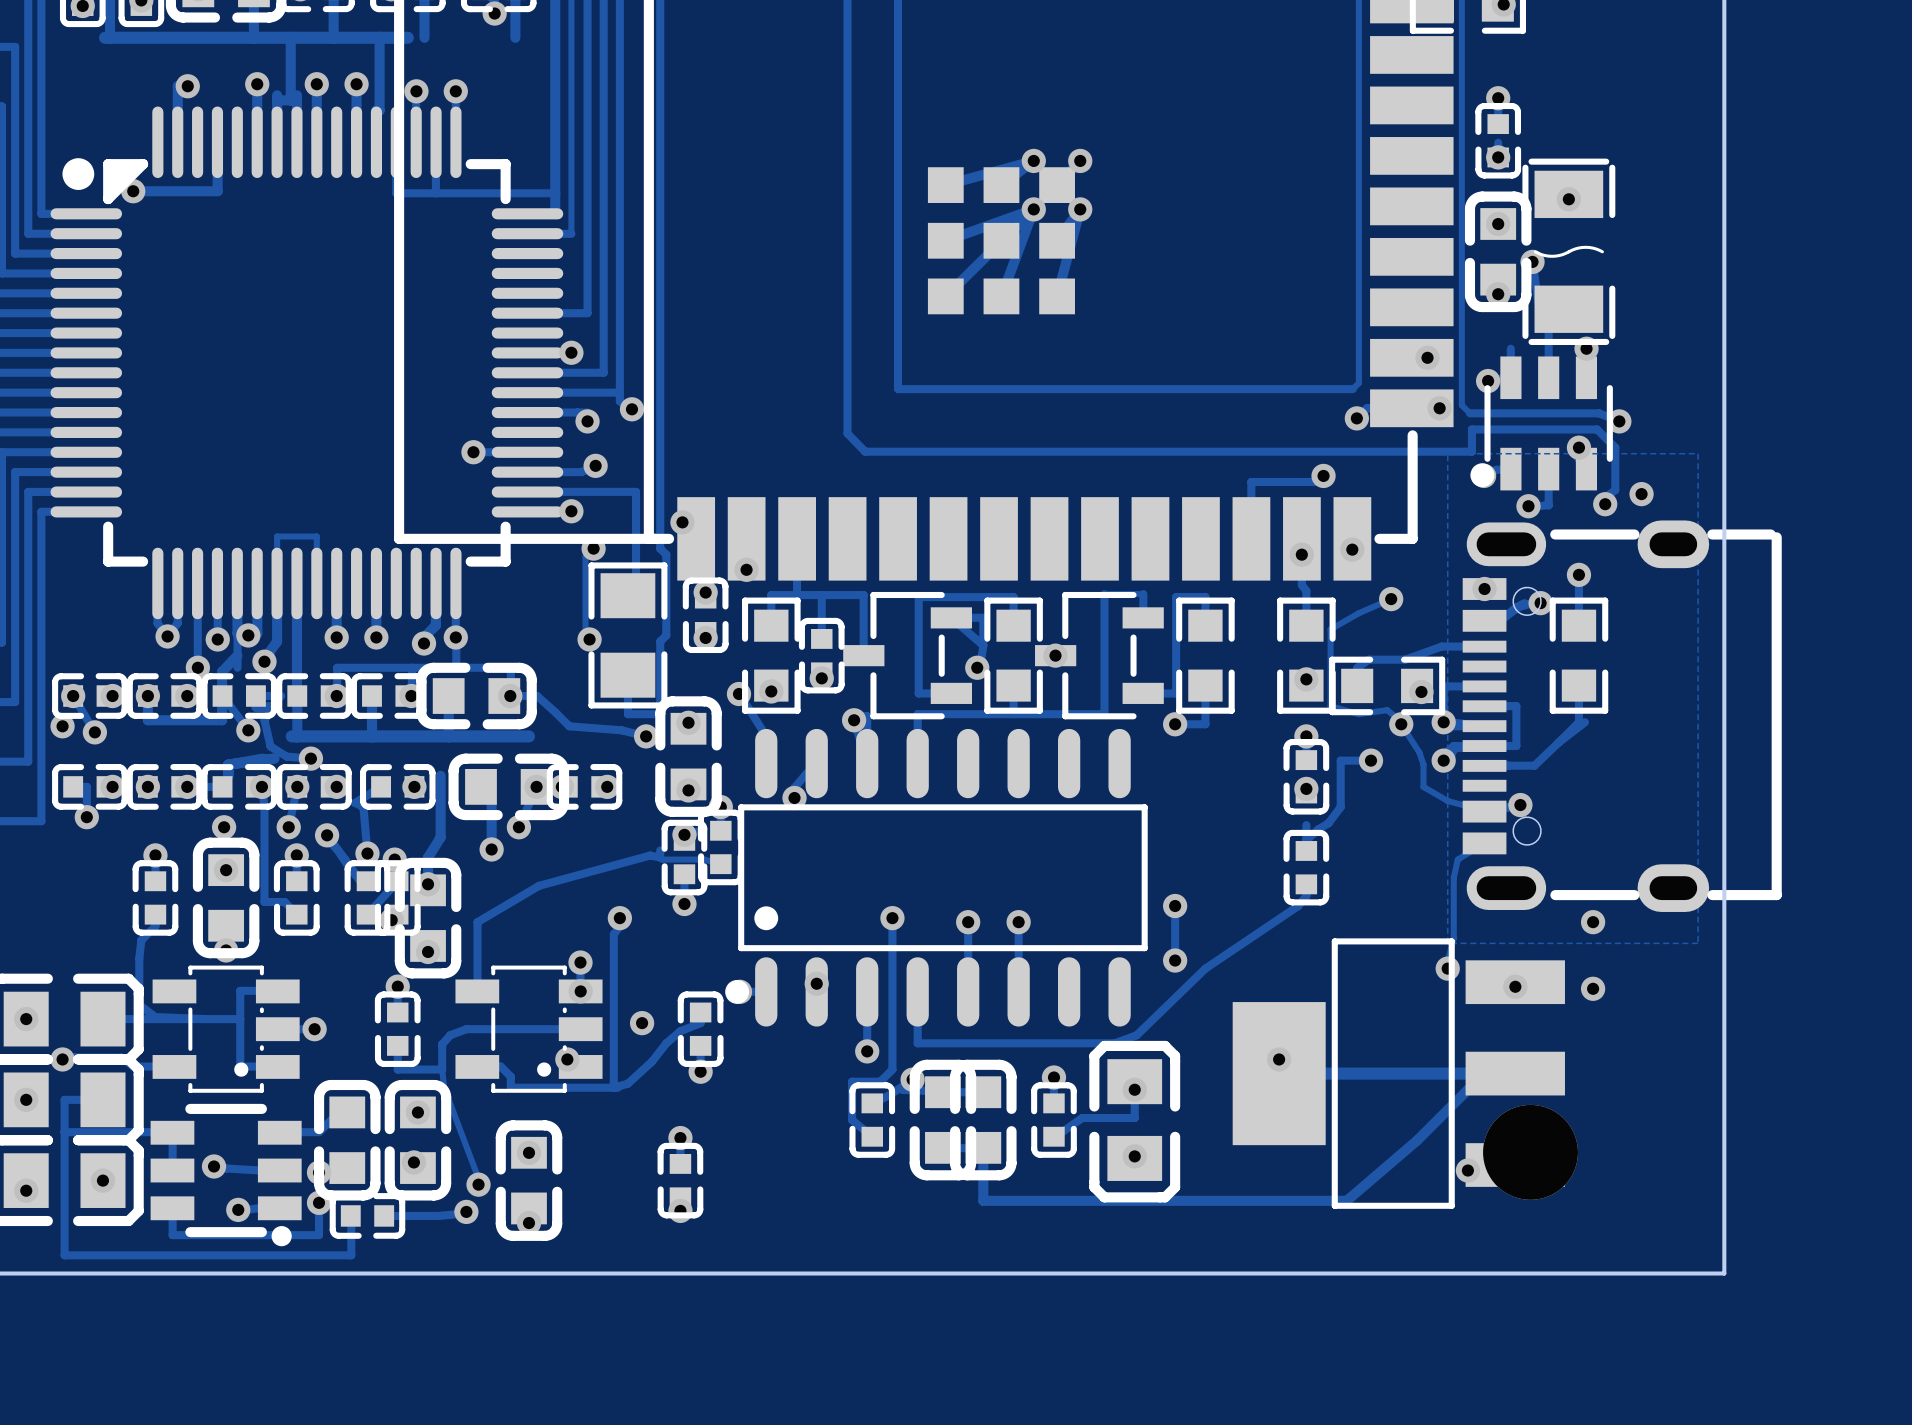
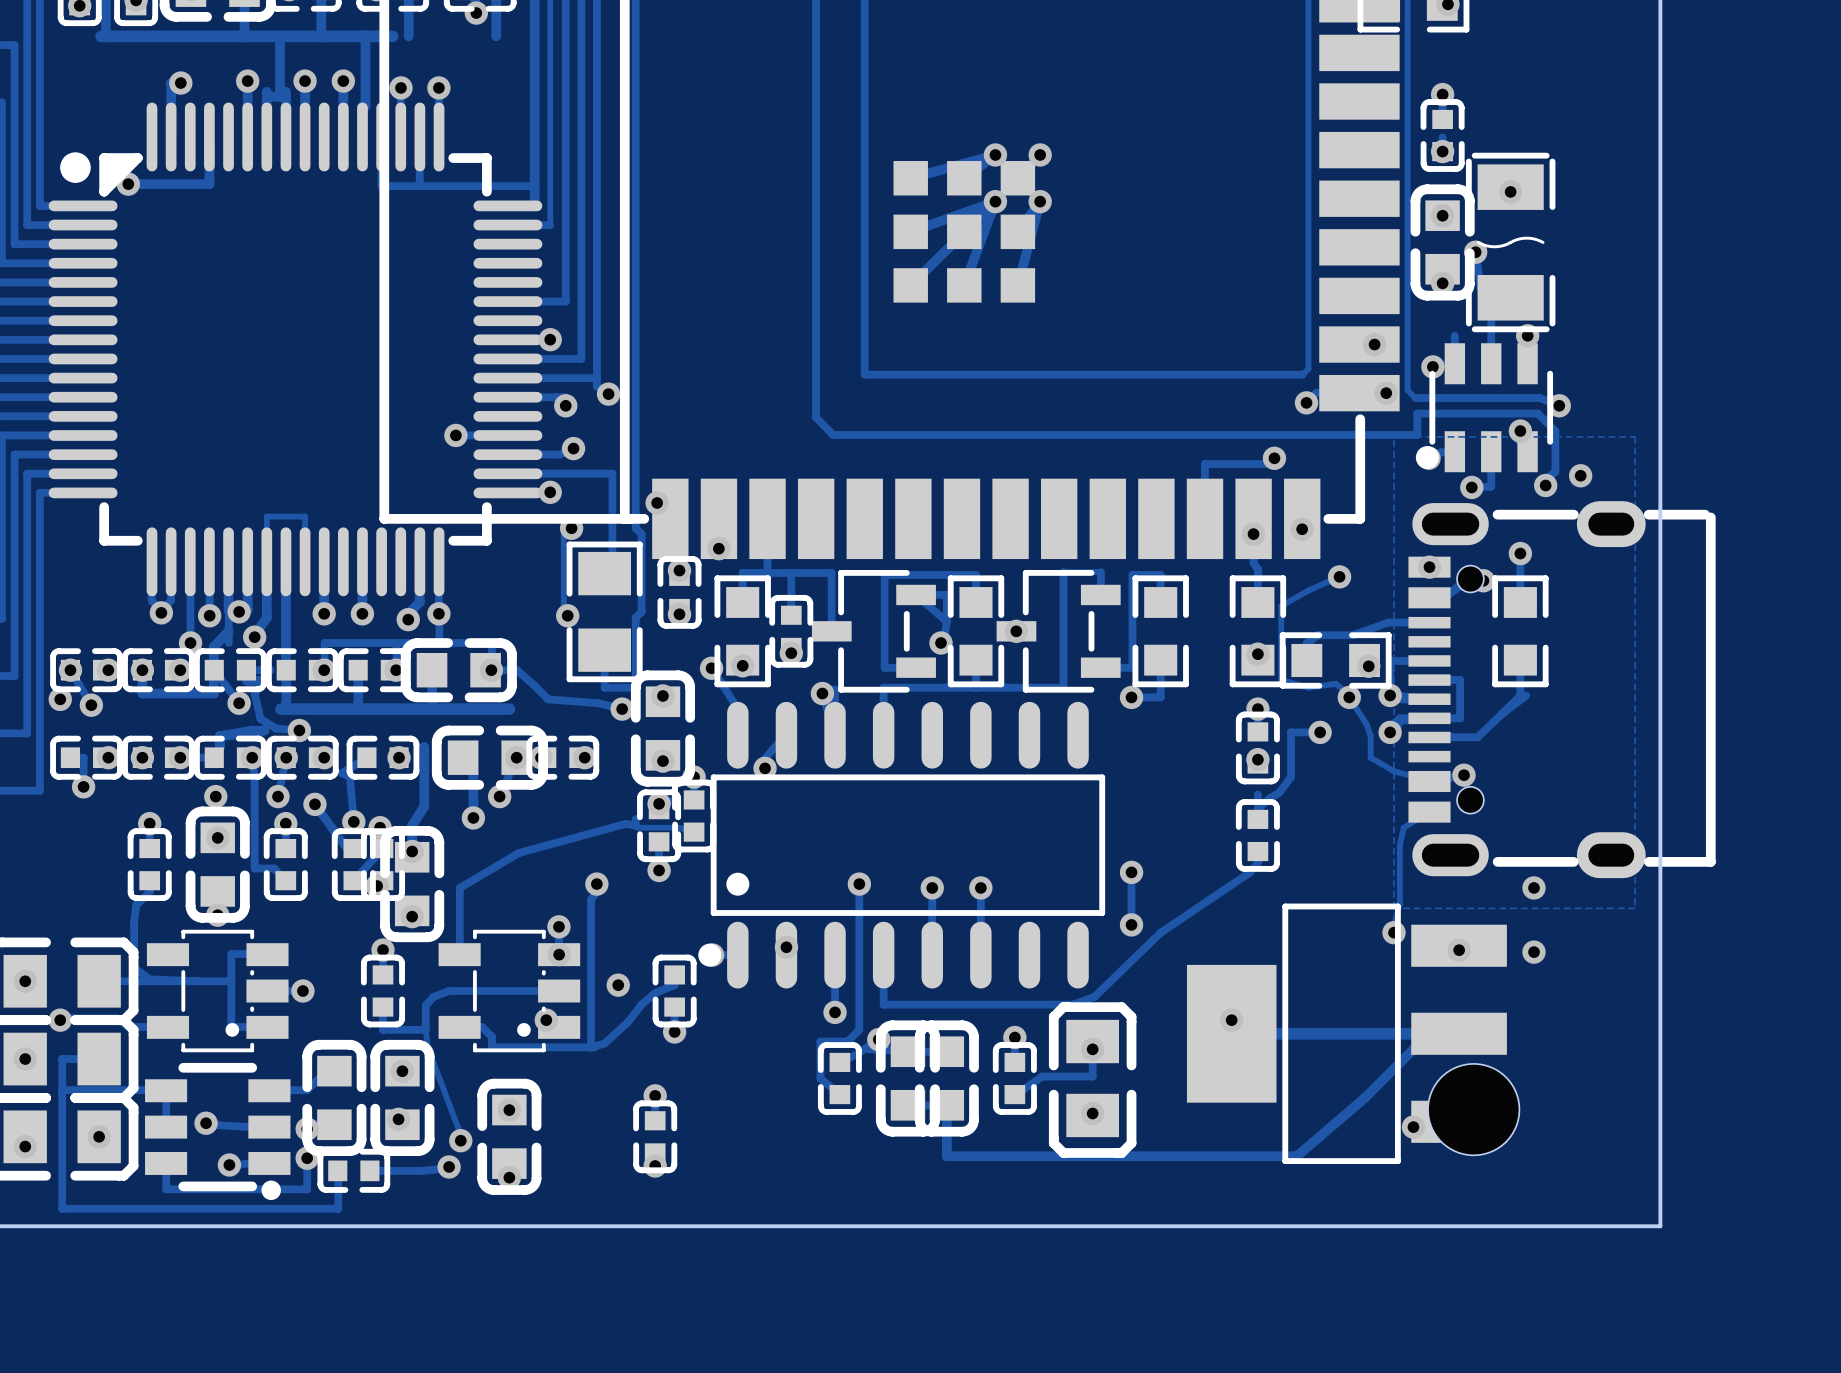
part footprint: [1462, 520, 1782, 912] -> [1408, 501, 1716, 879]
part: none -> (1470, 579)
part: none -> (1470, 800)
part footprint: [1483, 1104, 1578, 1200] -> [1428, 1063, 1520, 1156]

